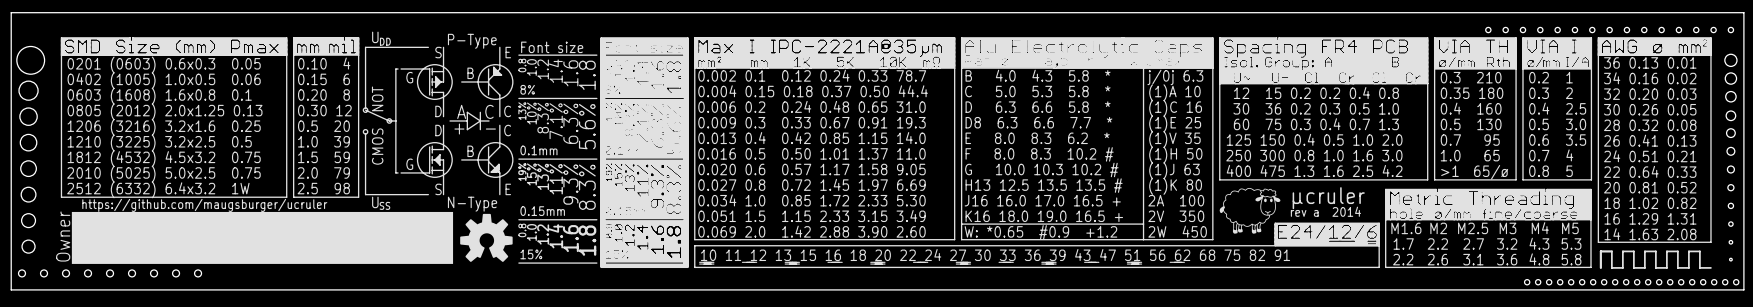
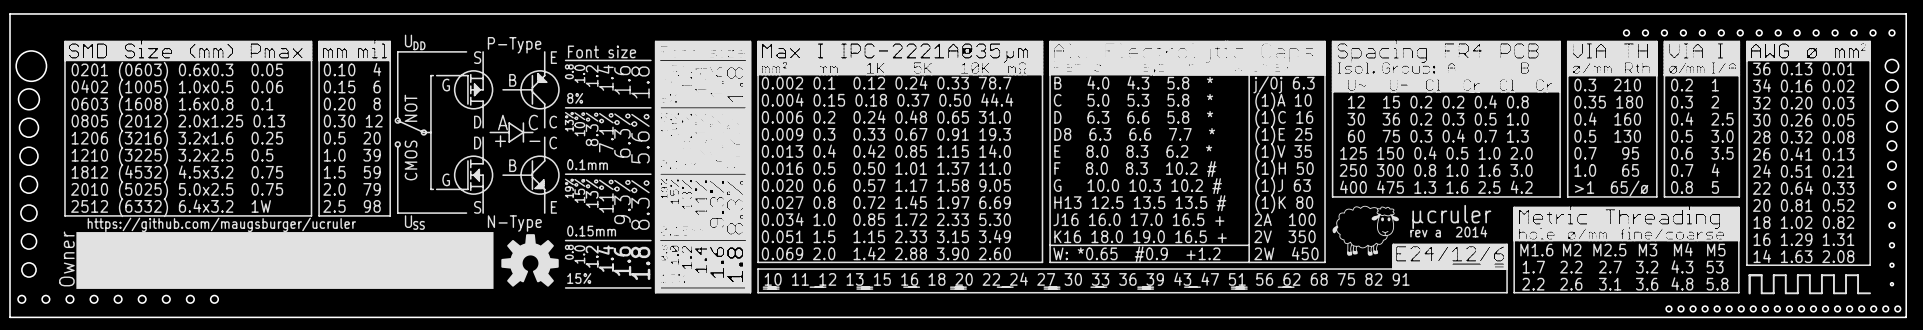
drawing shape: [1385, 188, 1592, 269] -> [1513, 206, 1740, 294]

